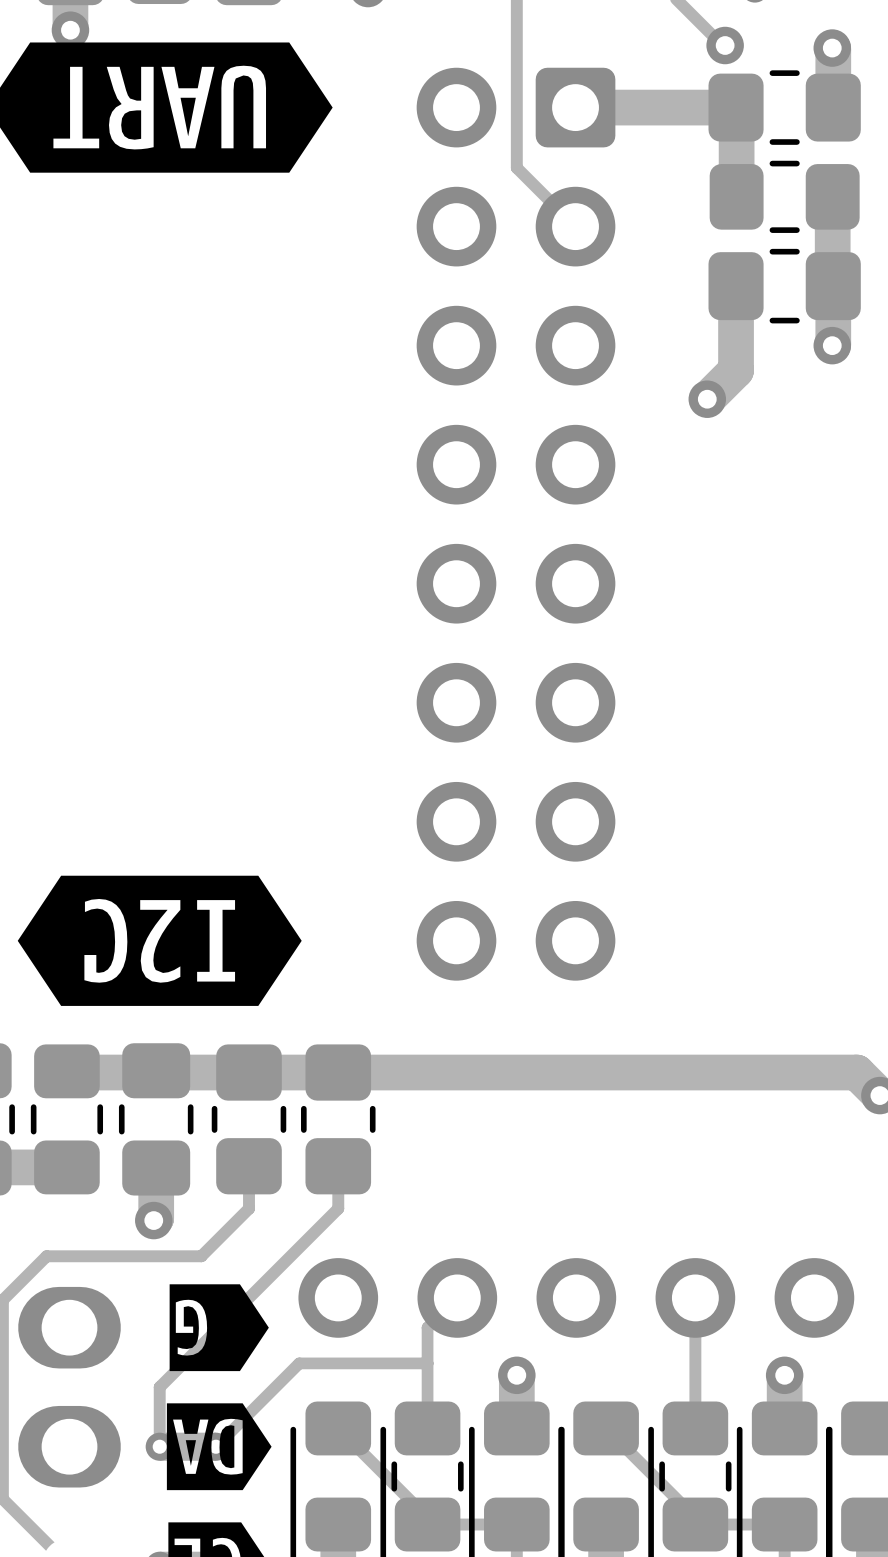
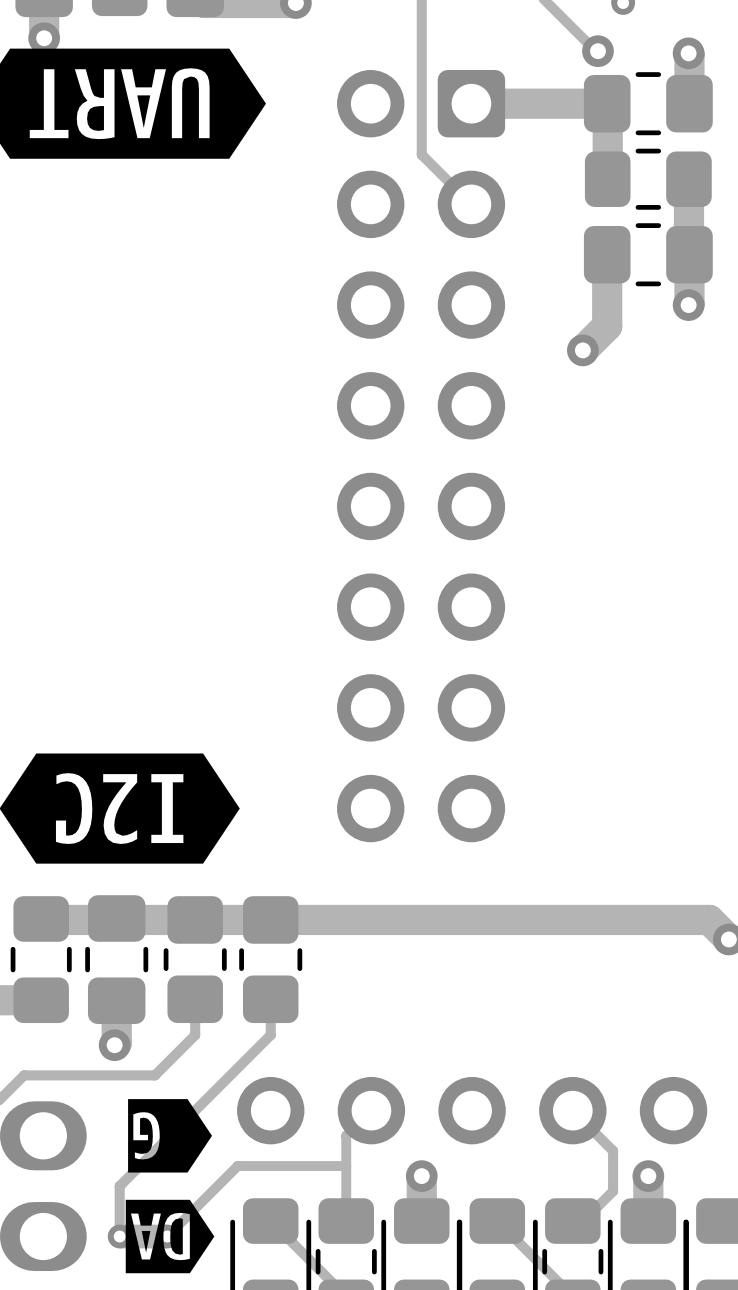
track: (695, 1297) (695, 1428) -> (572, 1110) (613, 1150) (613, 1191) (583, 1221) (572, 1221)

